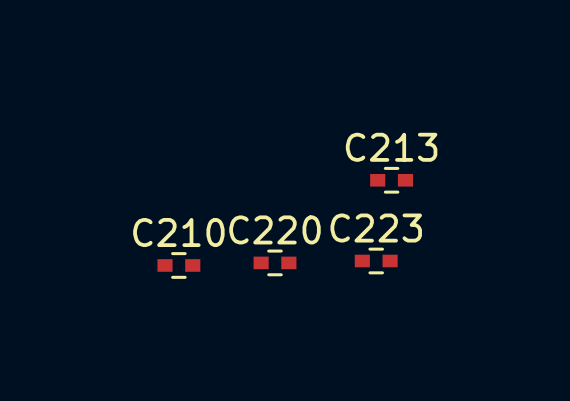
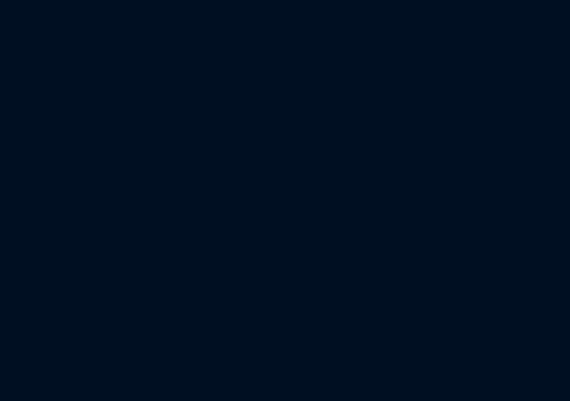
C213: (391, 180) -> none
C223: (376, 260) -> none
C220: (274, 262) -> none
C210: (178, 265) -> none

